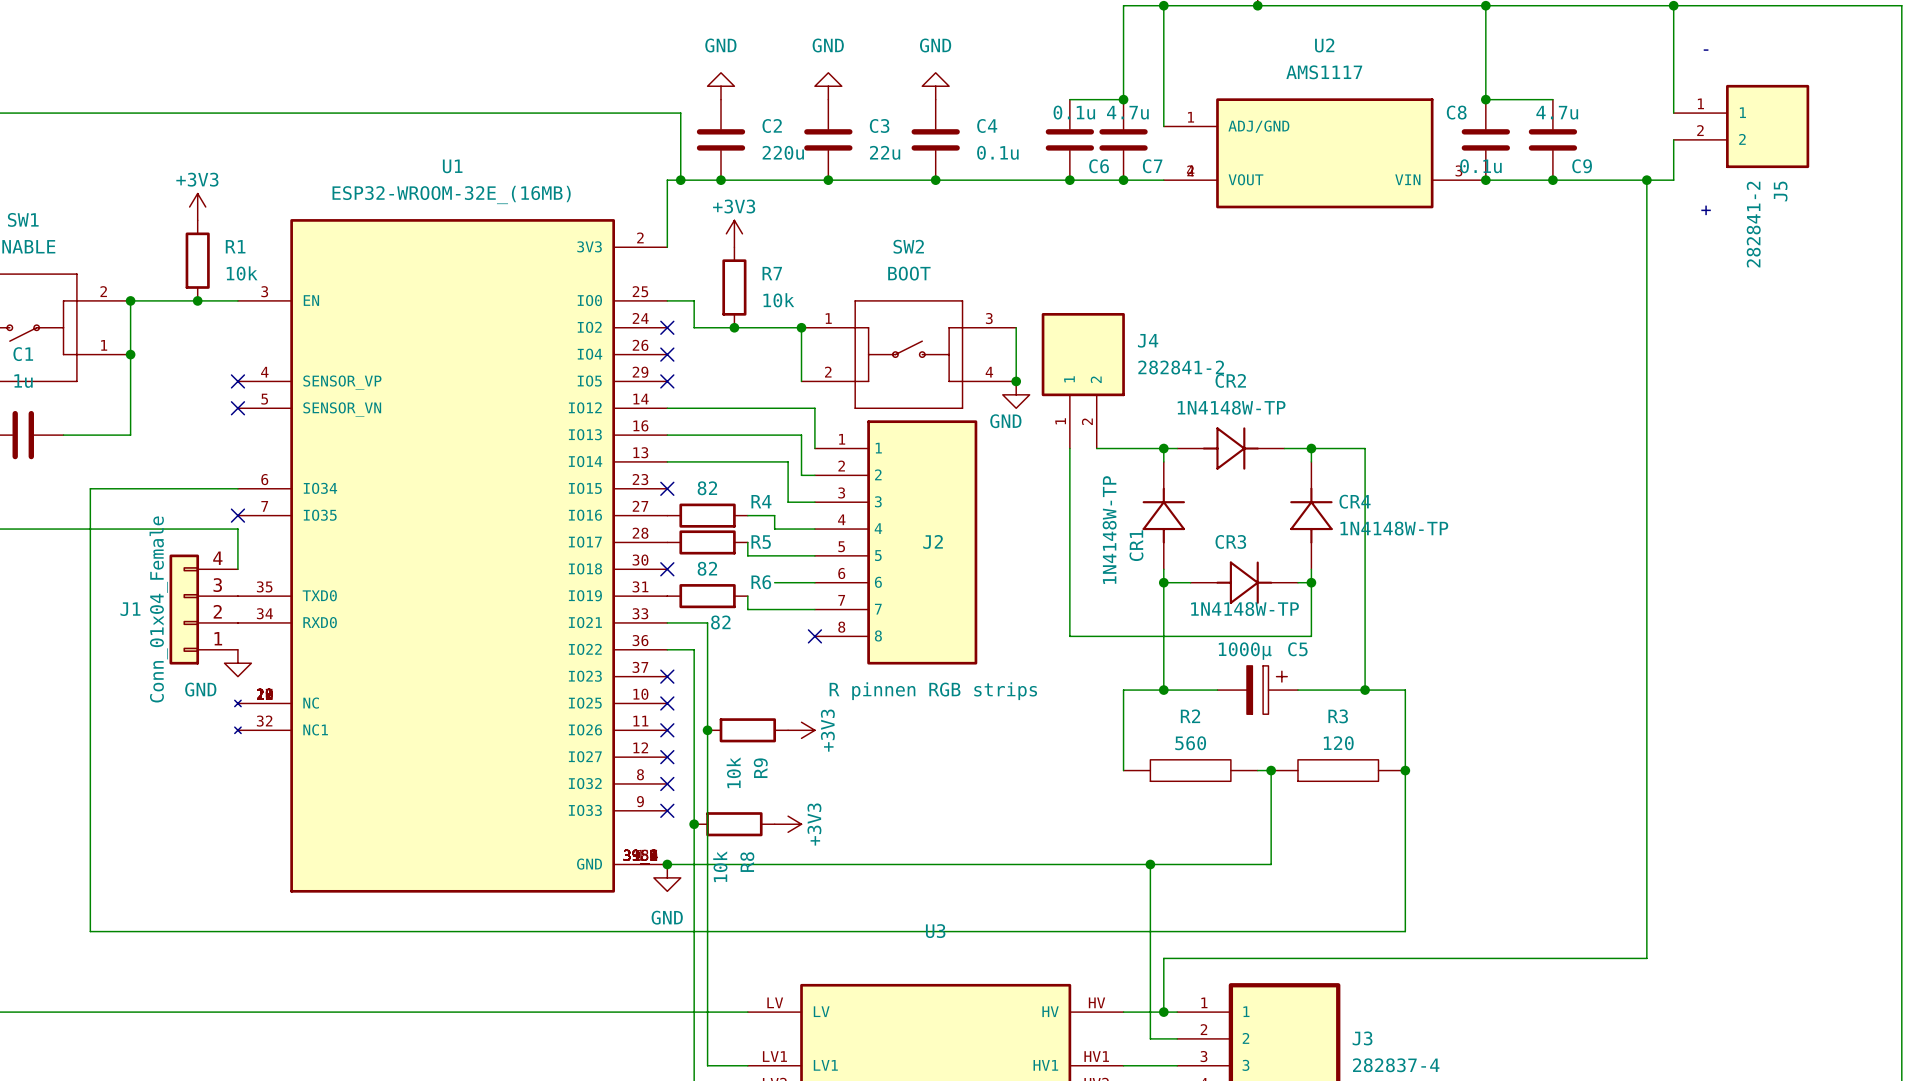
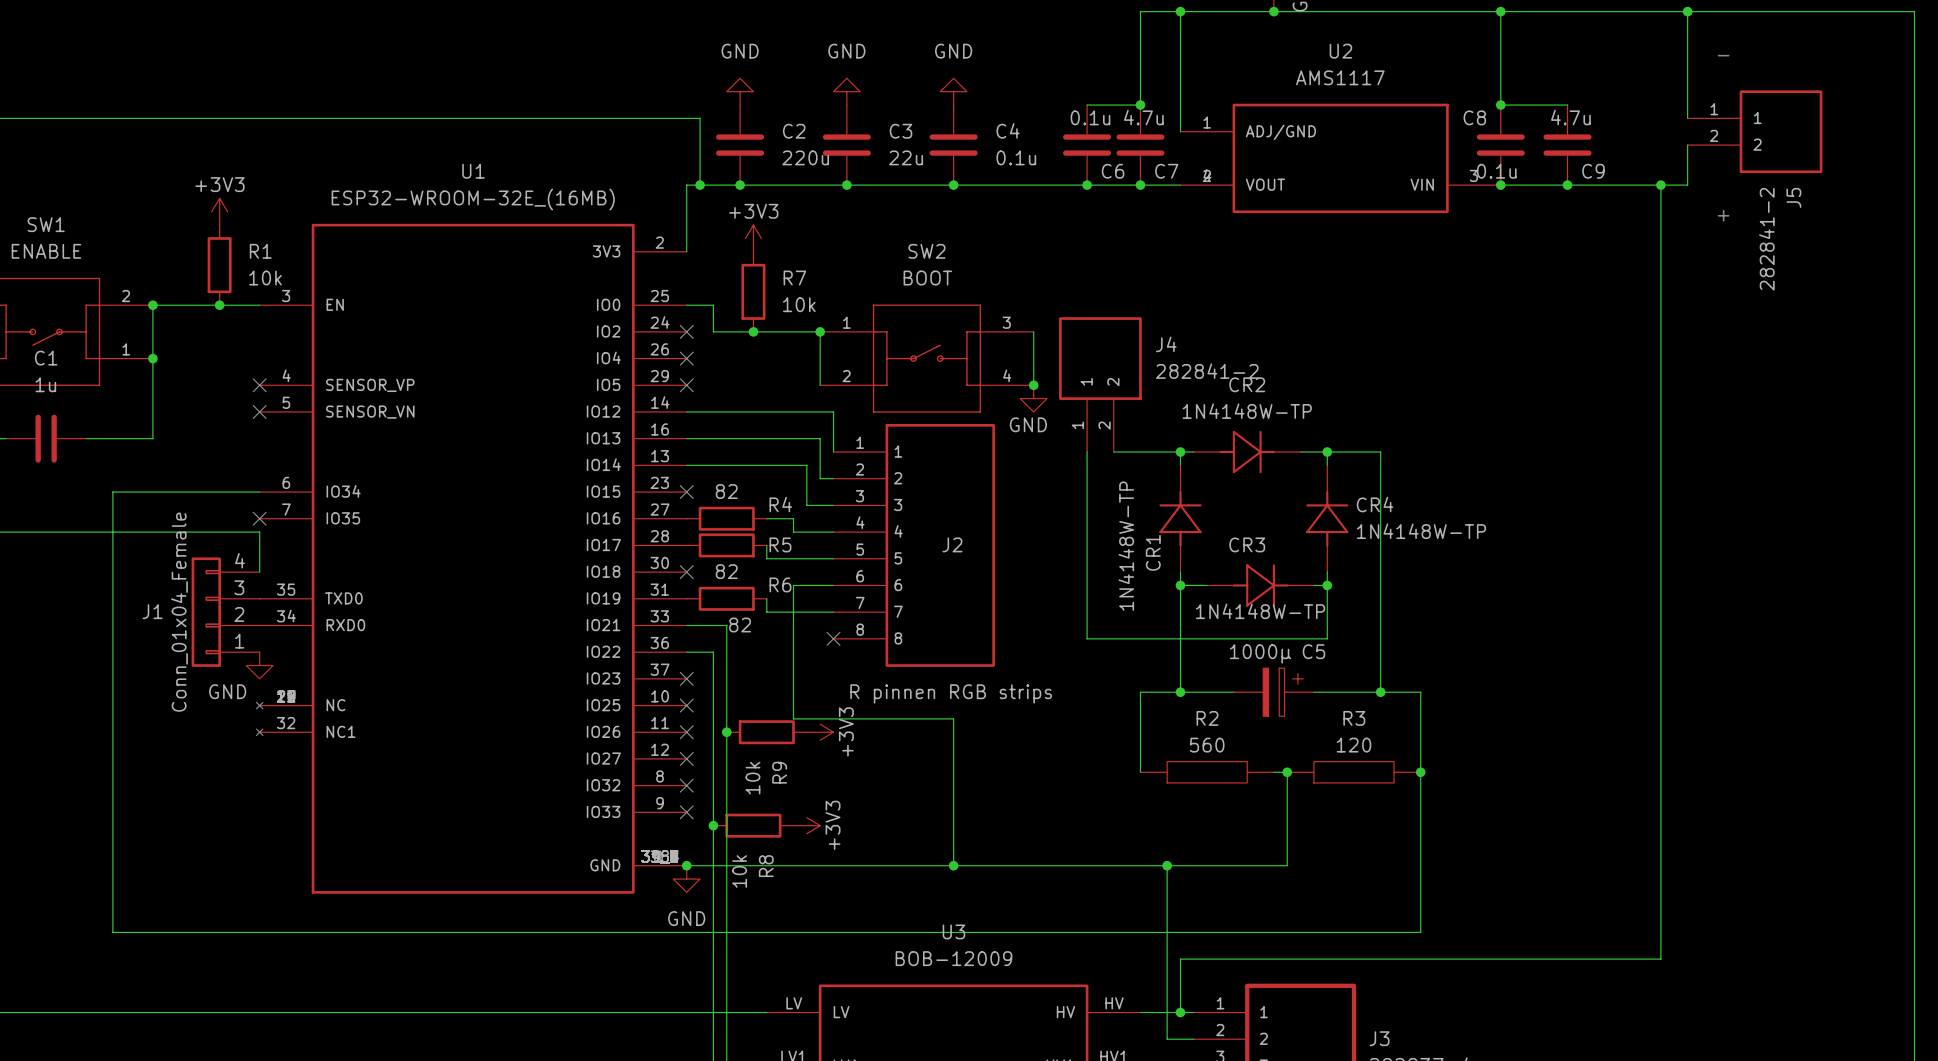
wire: none -> (793, 585) (793, 718) (953, 718) (953, 865)
junction: none -> (953, 865)
U3 value: none -> BOB-12009 (953, 958)

